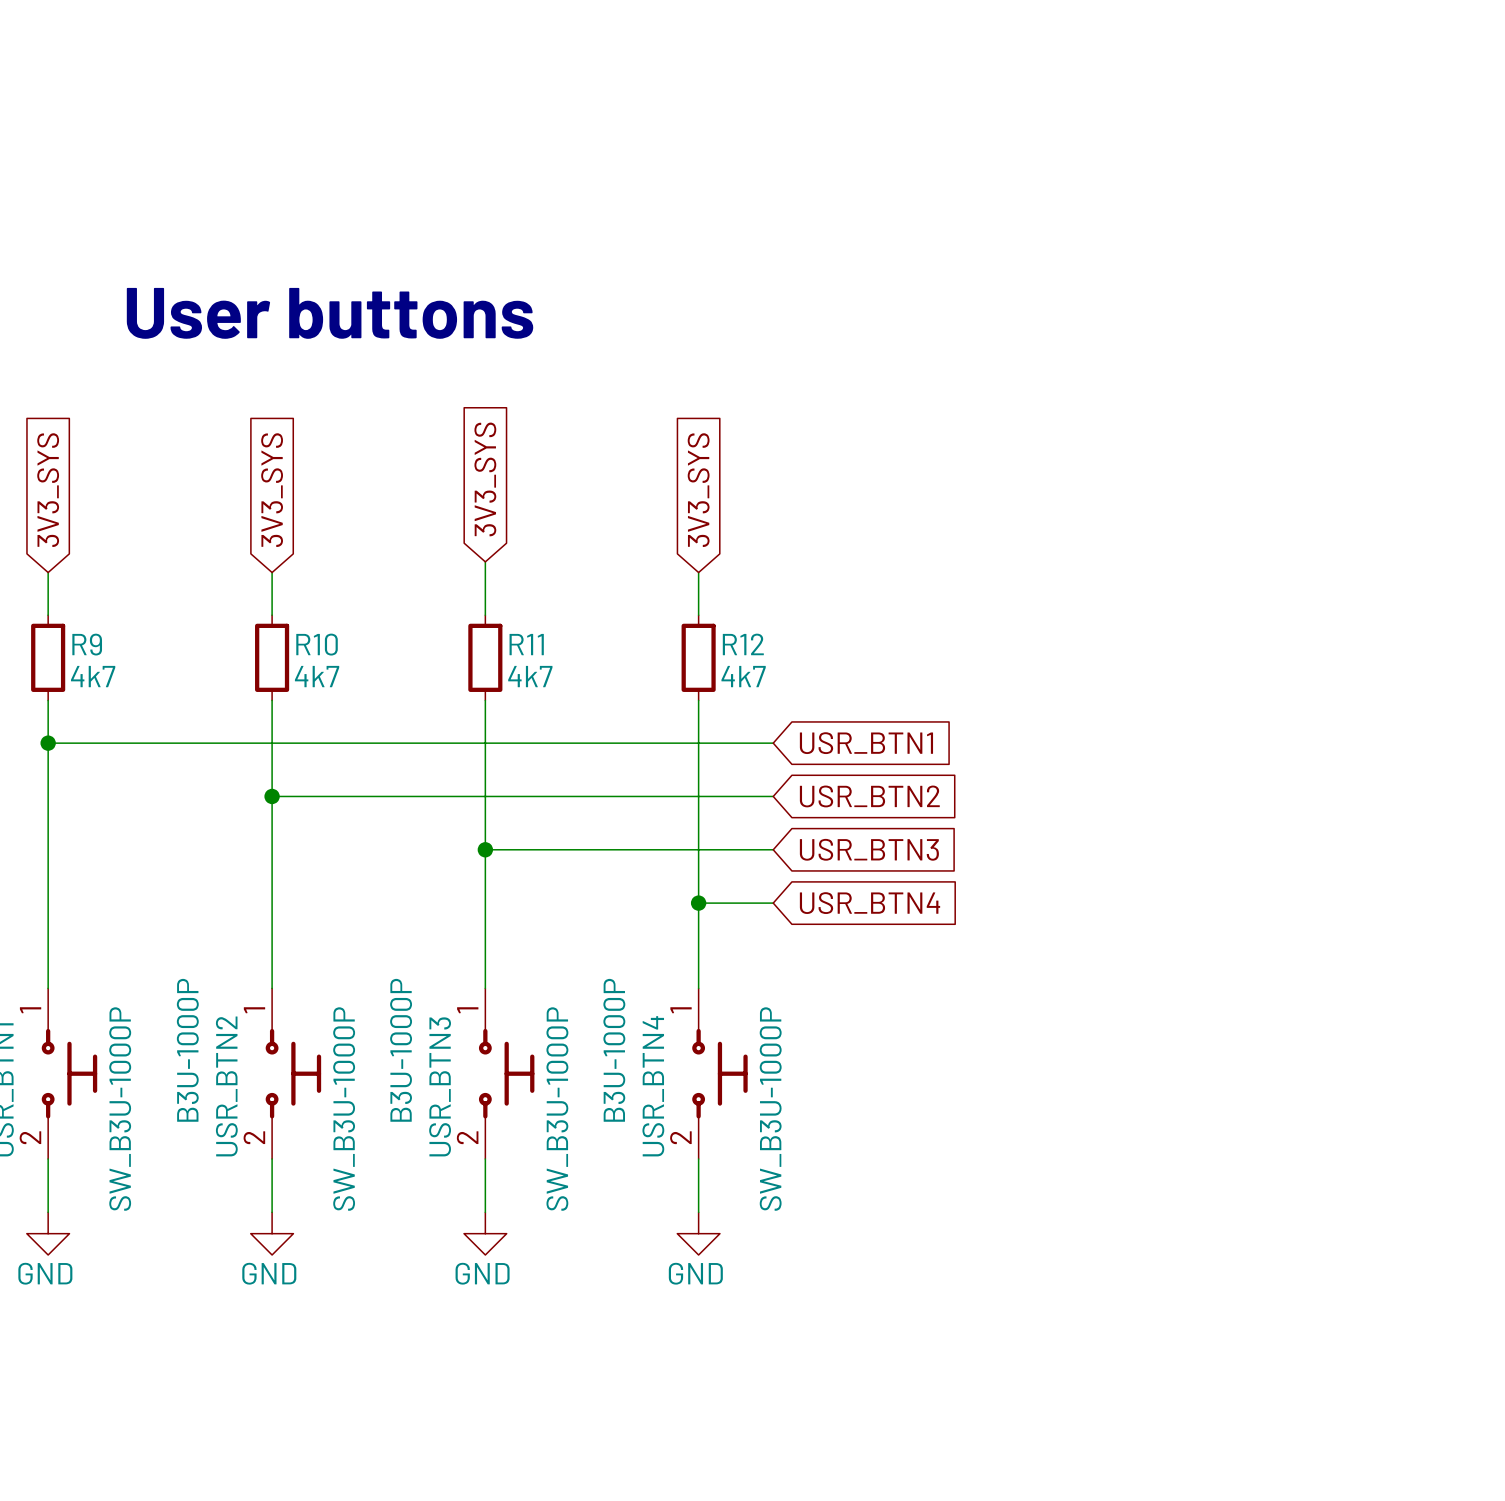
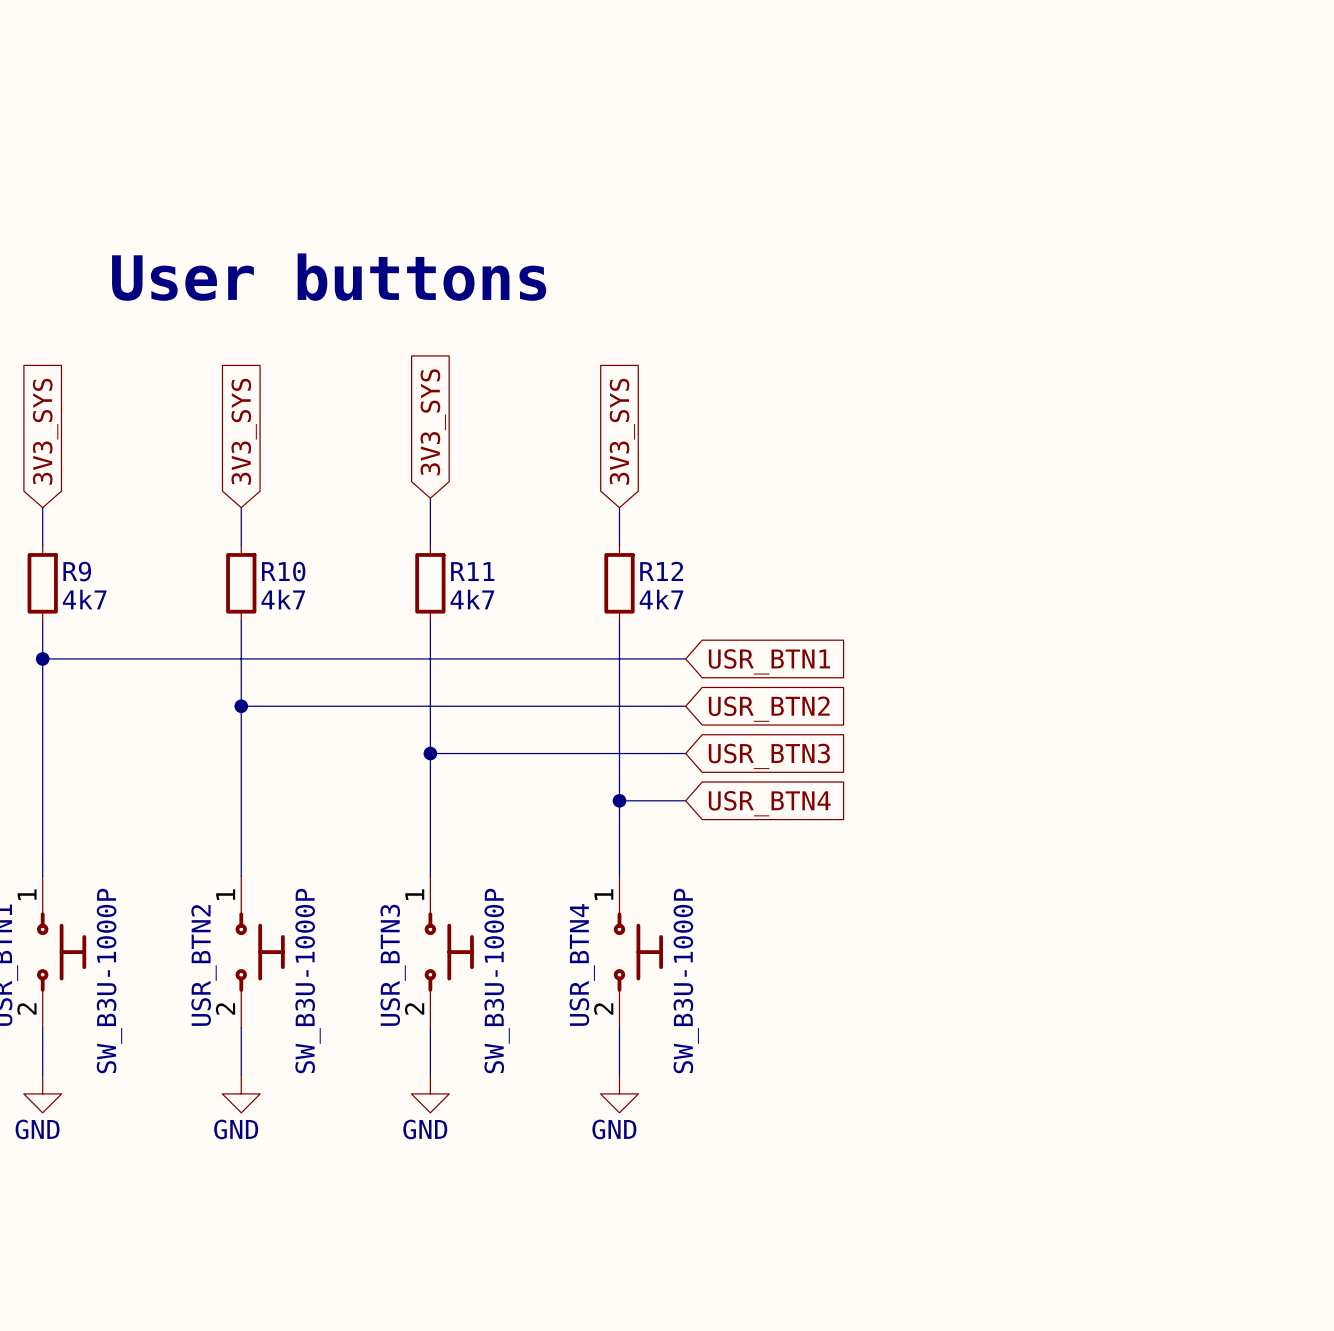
USR_BTN2 text: B3U-1000P (187, 1050) -> none
USR_BTN3 text: B3U-1000P (401, 1050) -> none
USR_BTN4 text: B3U-1000P (614, 1050) -> none

